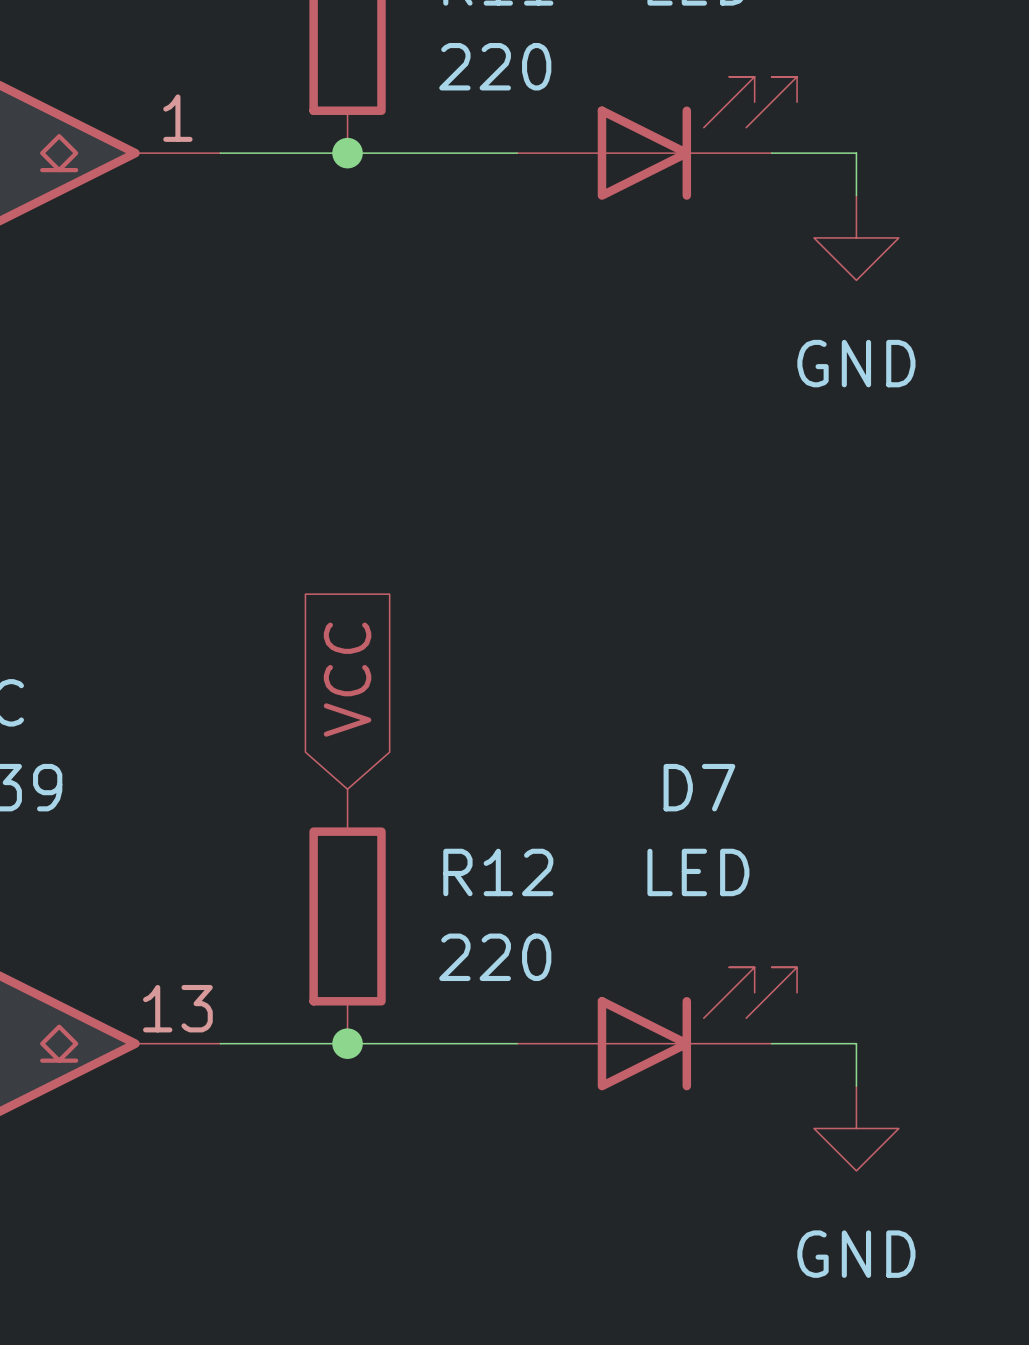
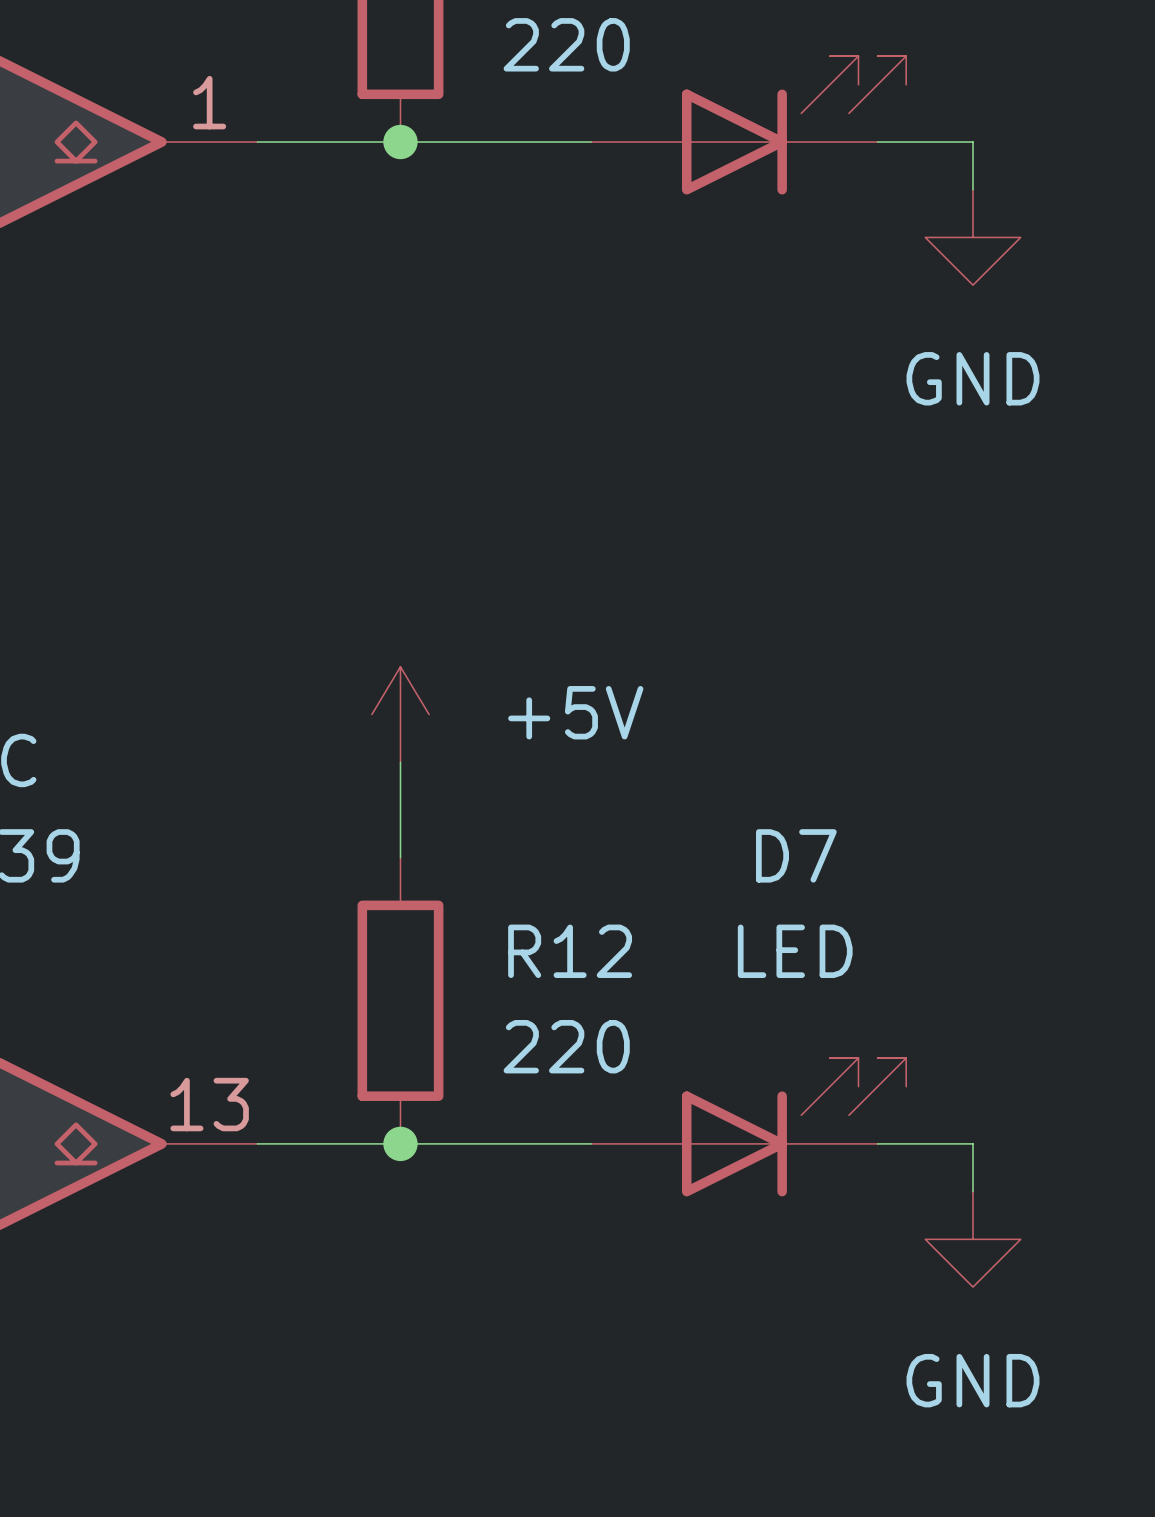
power symbol: none -> +5V (400, 714)
global label: VCC (347, 679) -> none
wire: none -> (400, 762) (400, 857)

